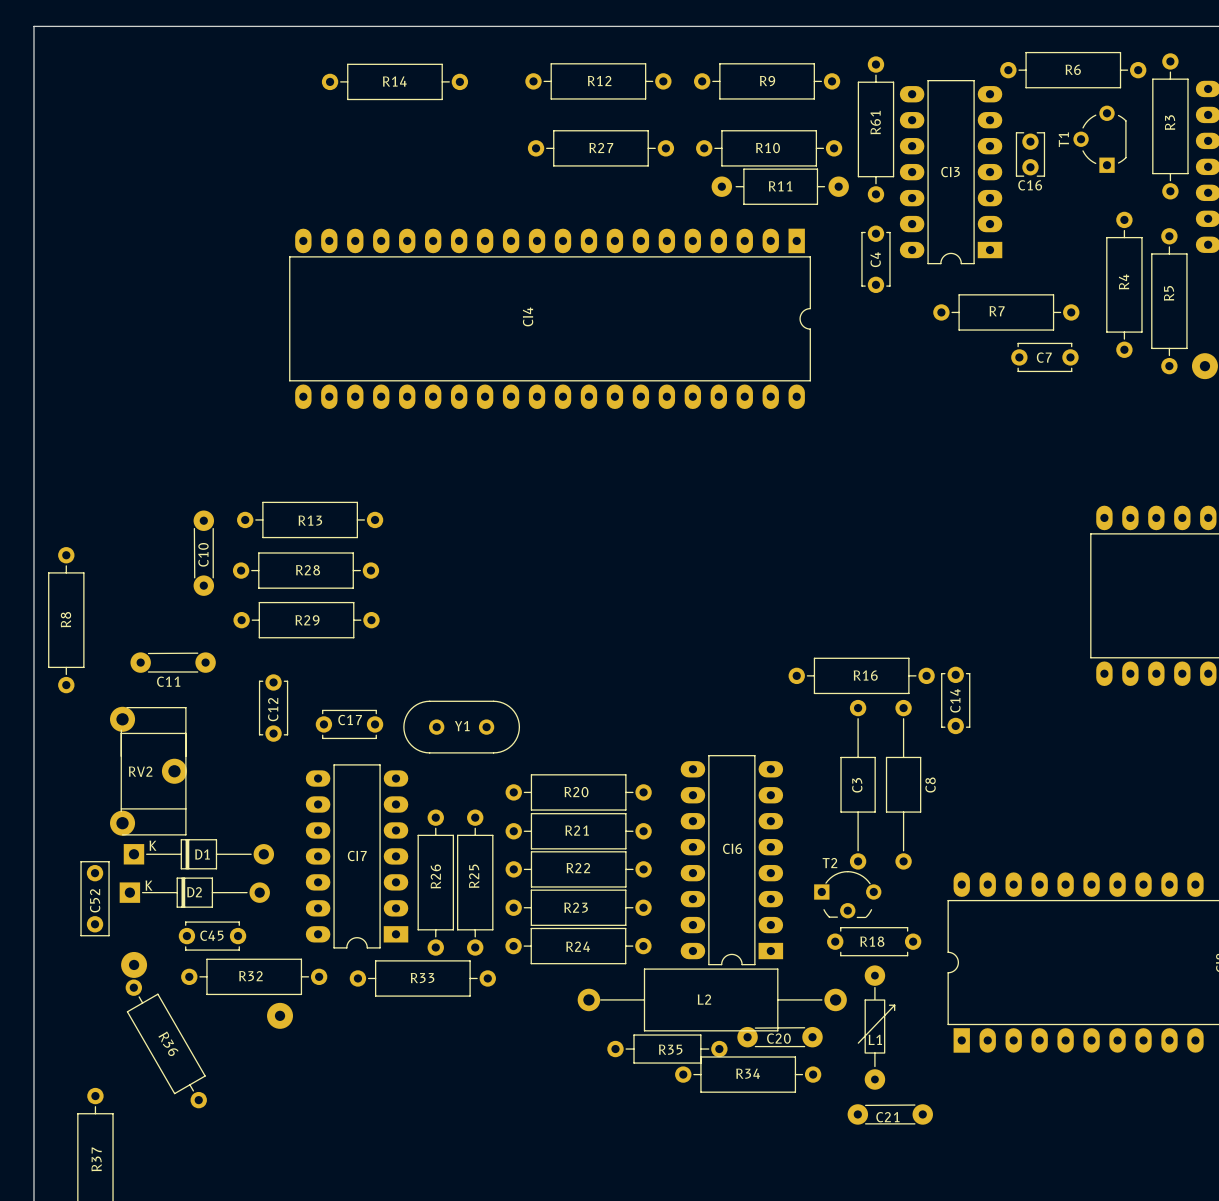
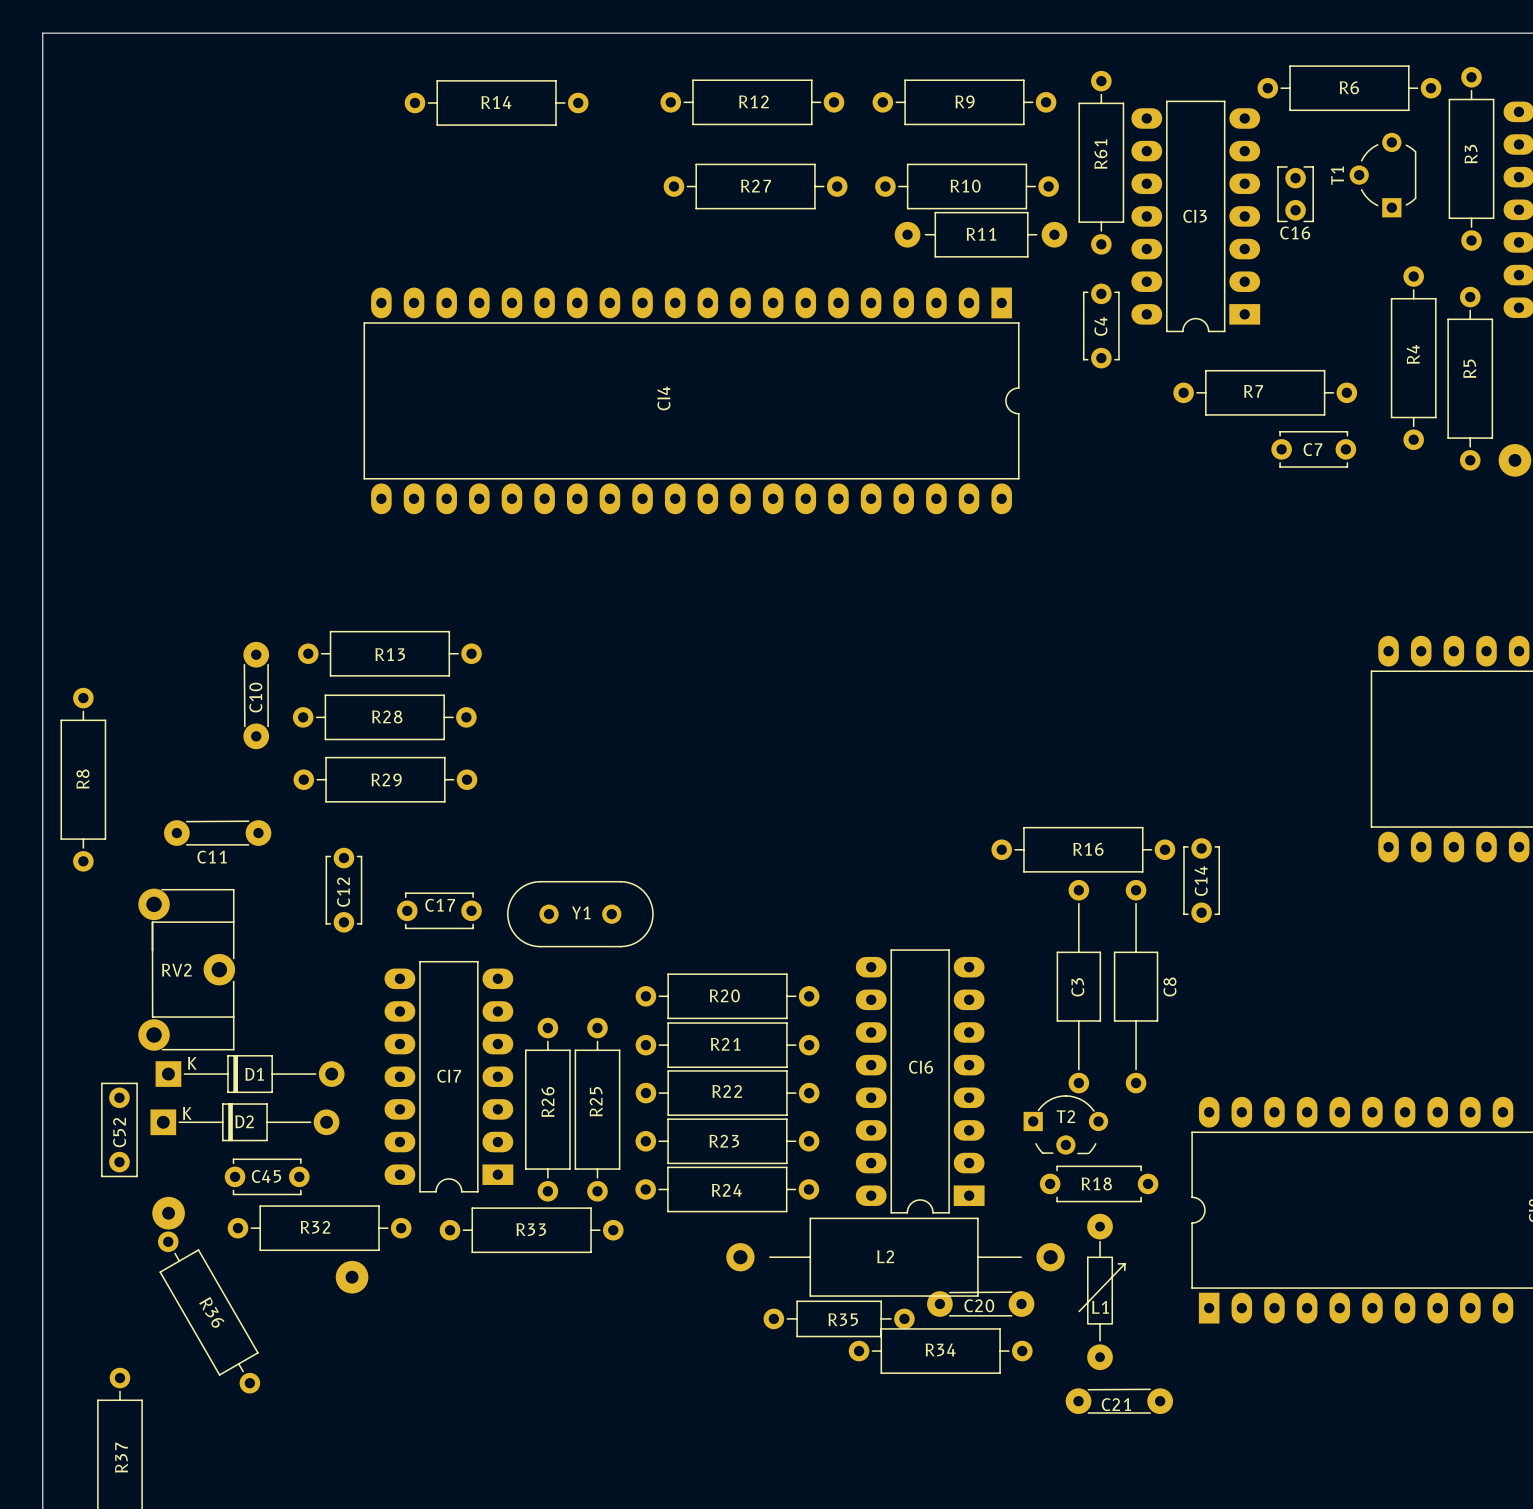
RV2 footprint: [110, 706, 187, 836] -> [138, 888, 236, 1051]
T2 name position: T2 (829, 863) -> T2 (1065, 1116)
L2 footprint: [577, 968, 847, 1032] -> [726, 1217, 1065, 1297]

